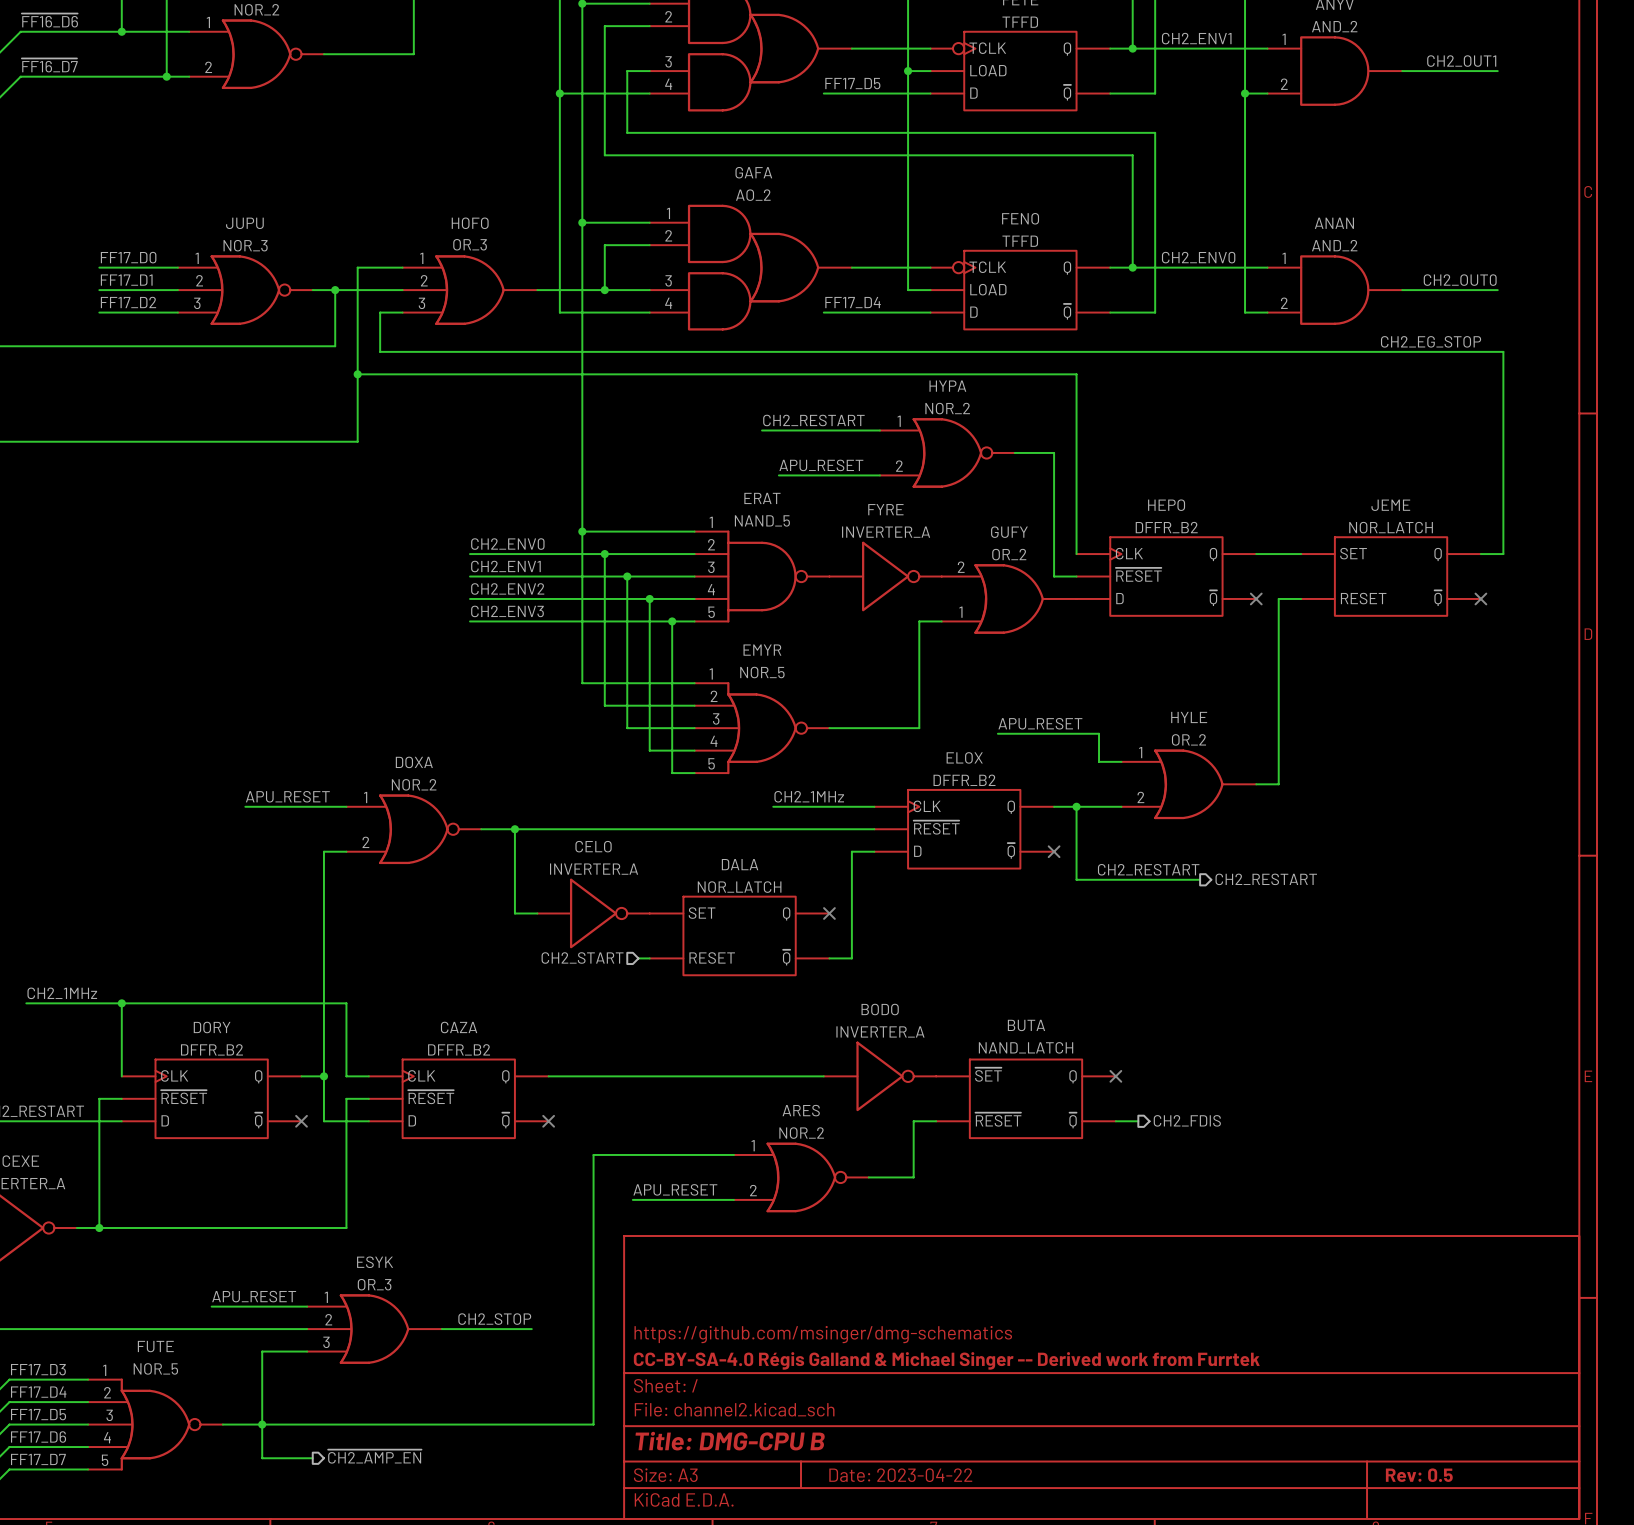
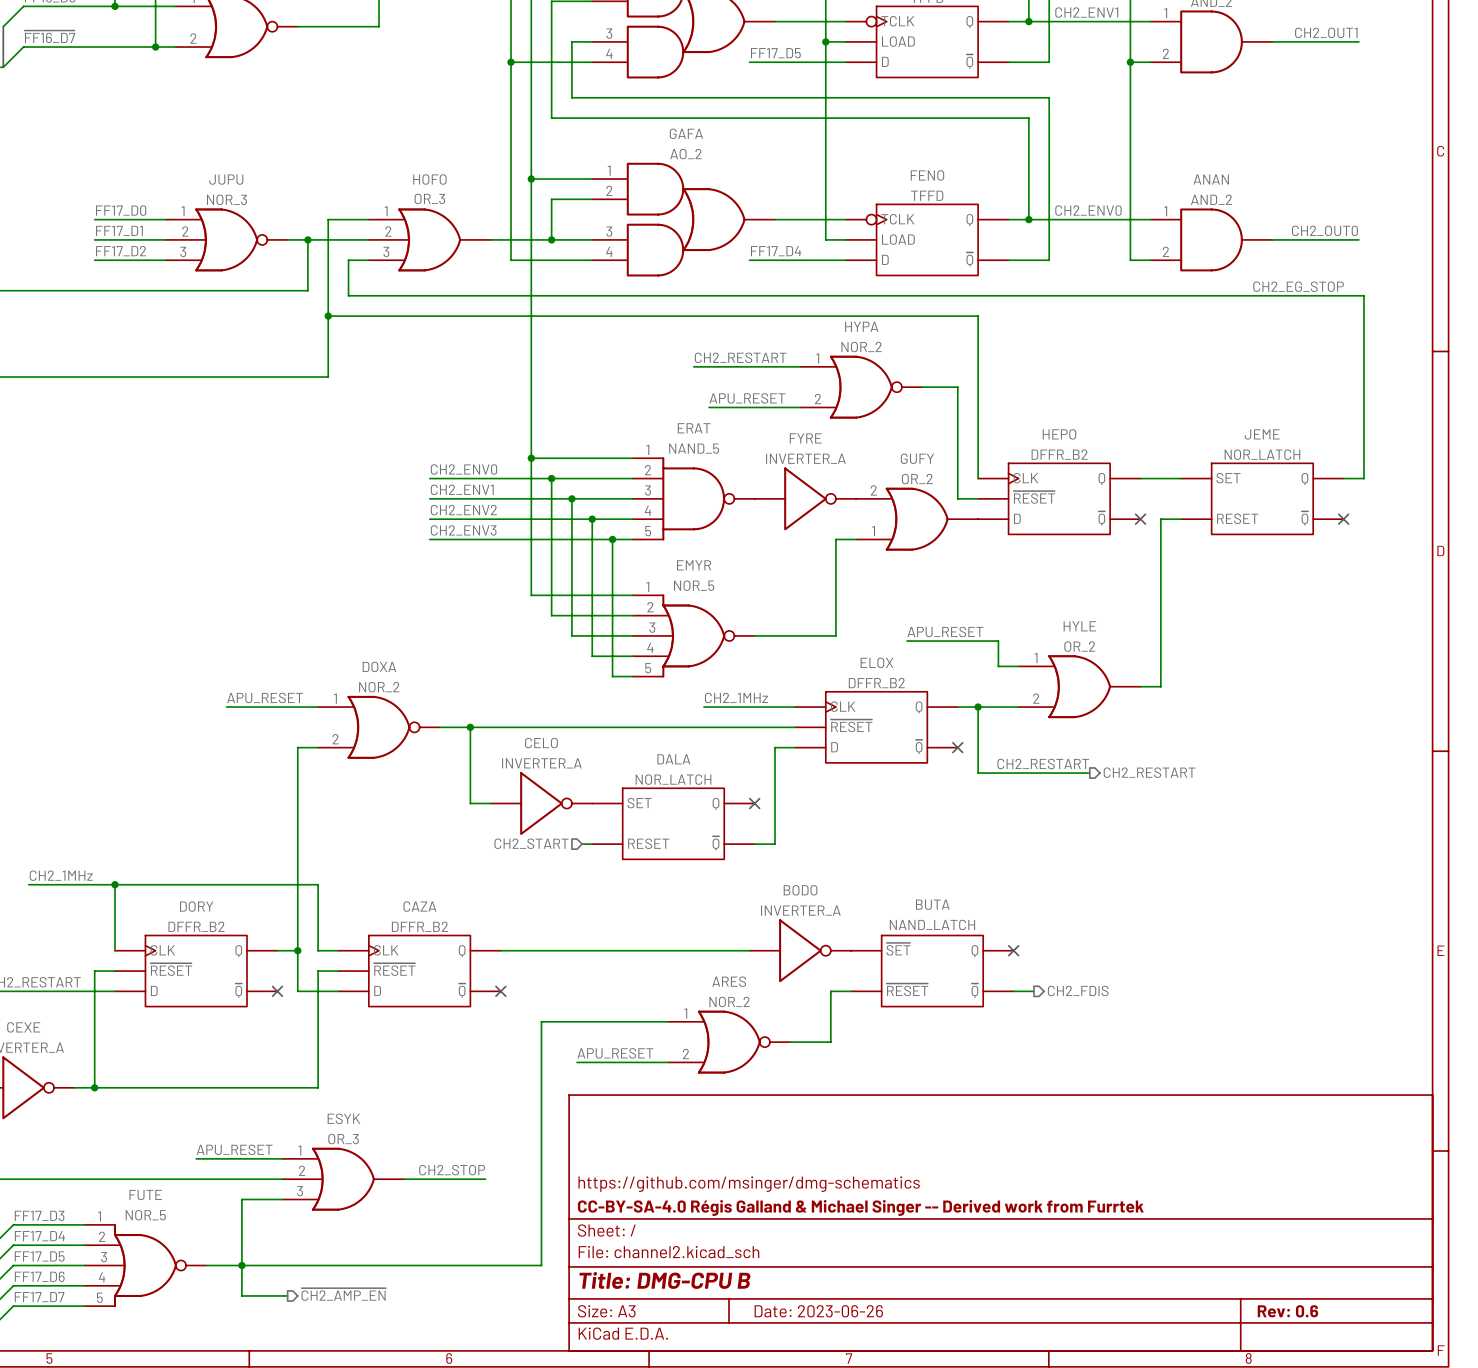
title block: Date: 2023-04-22 (900, 1475) -> Date: 2023-06-26 (818, 1311)
title block: Rev: 0.5 (1419, 1475) -> Rev: 0.6 (1287, 1311)

